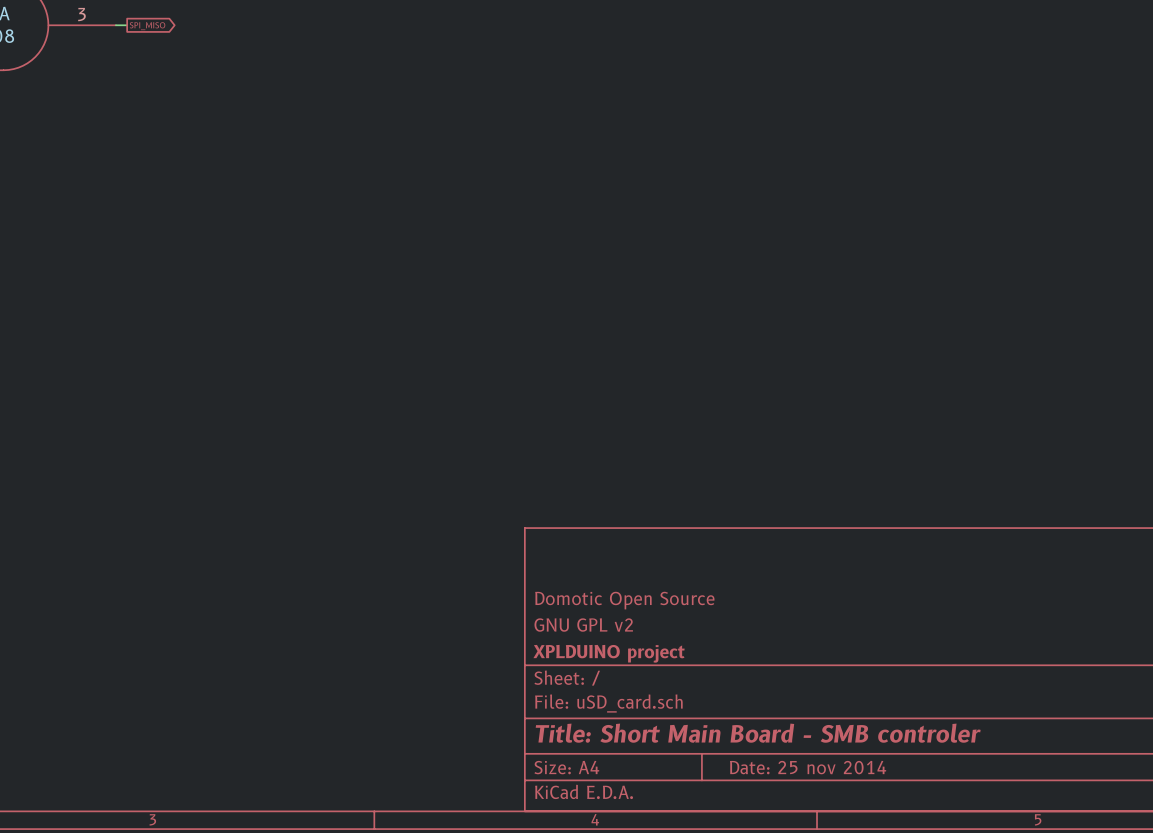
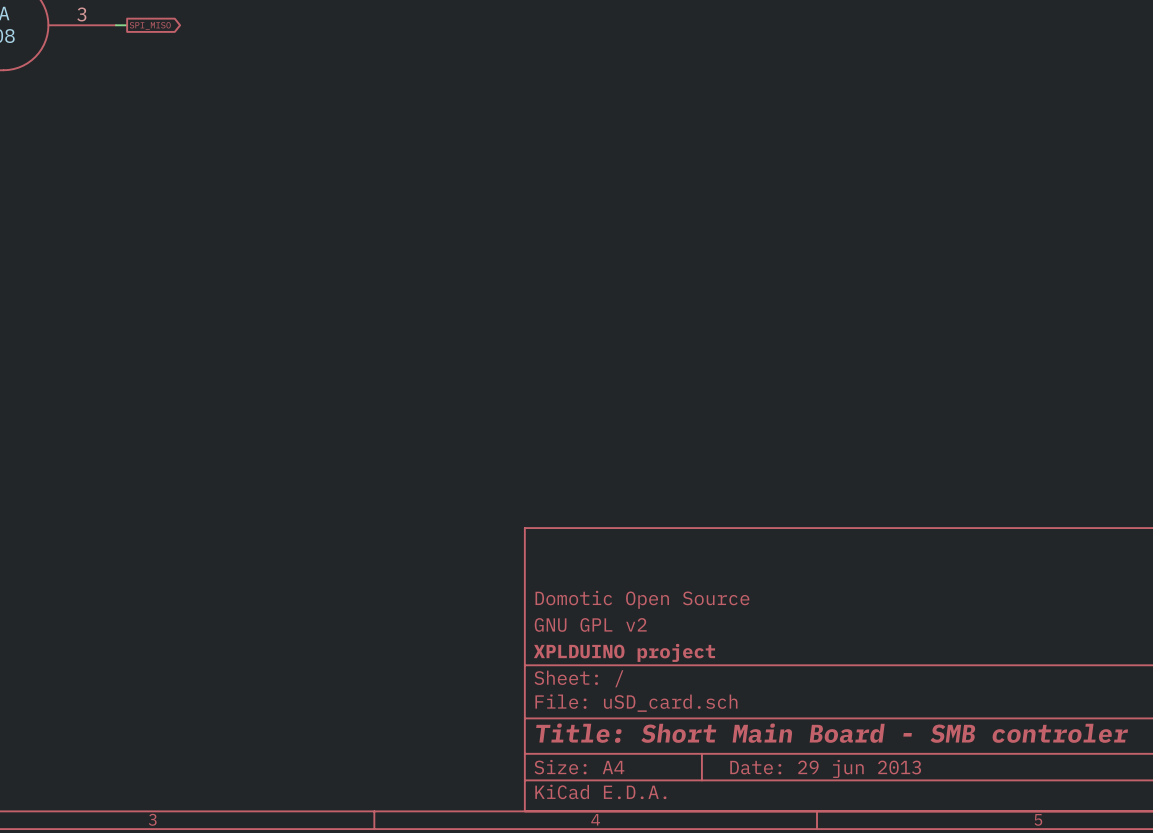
title block: Date: 25 nov 2014 (808, 767) -> Date: 29 jun 2013 (825, 768)

